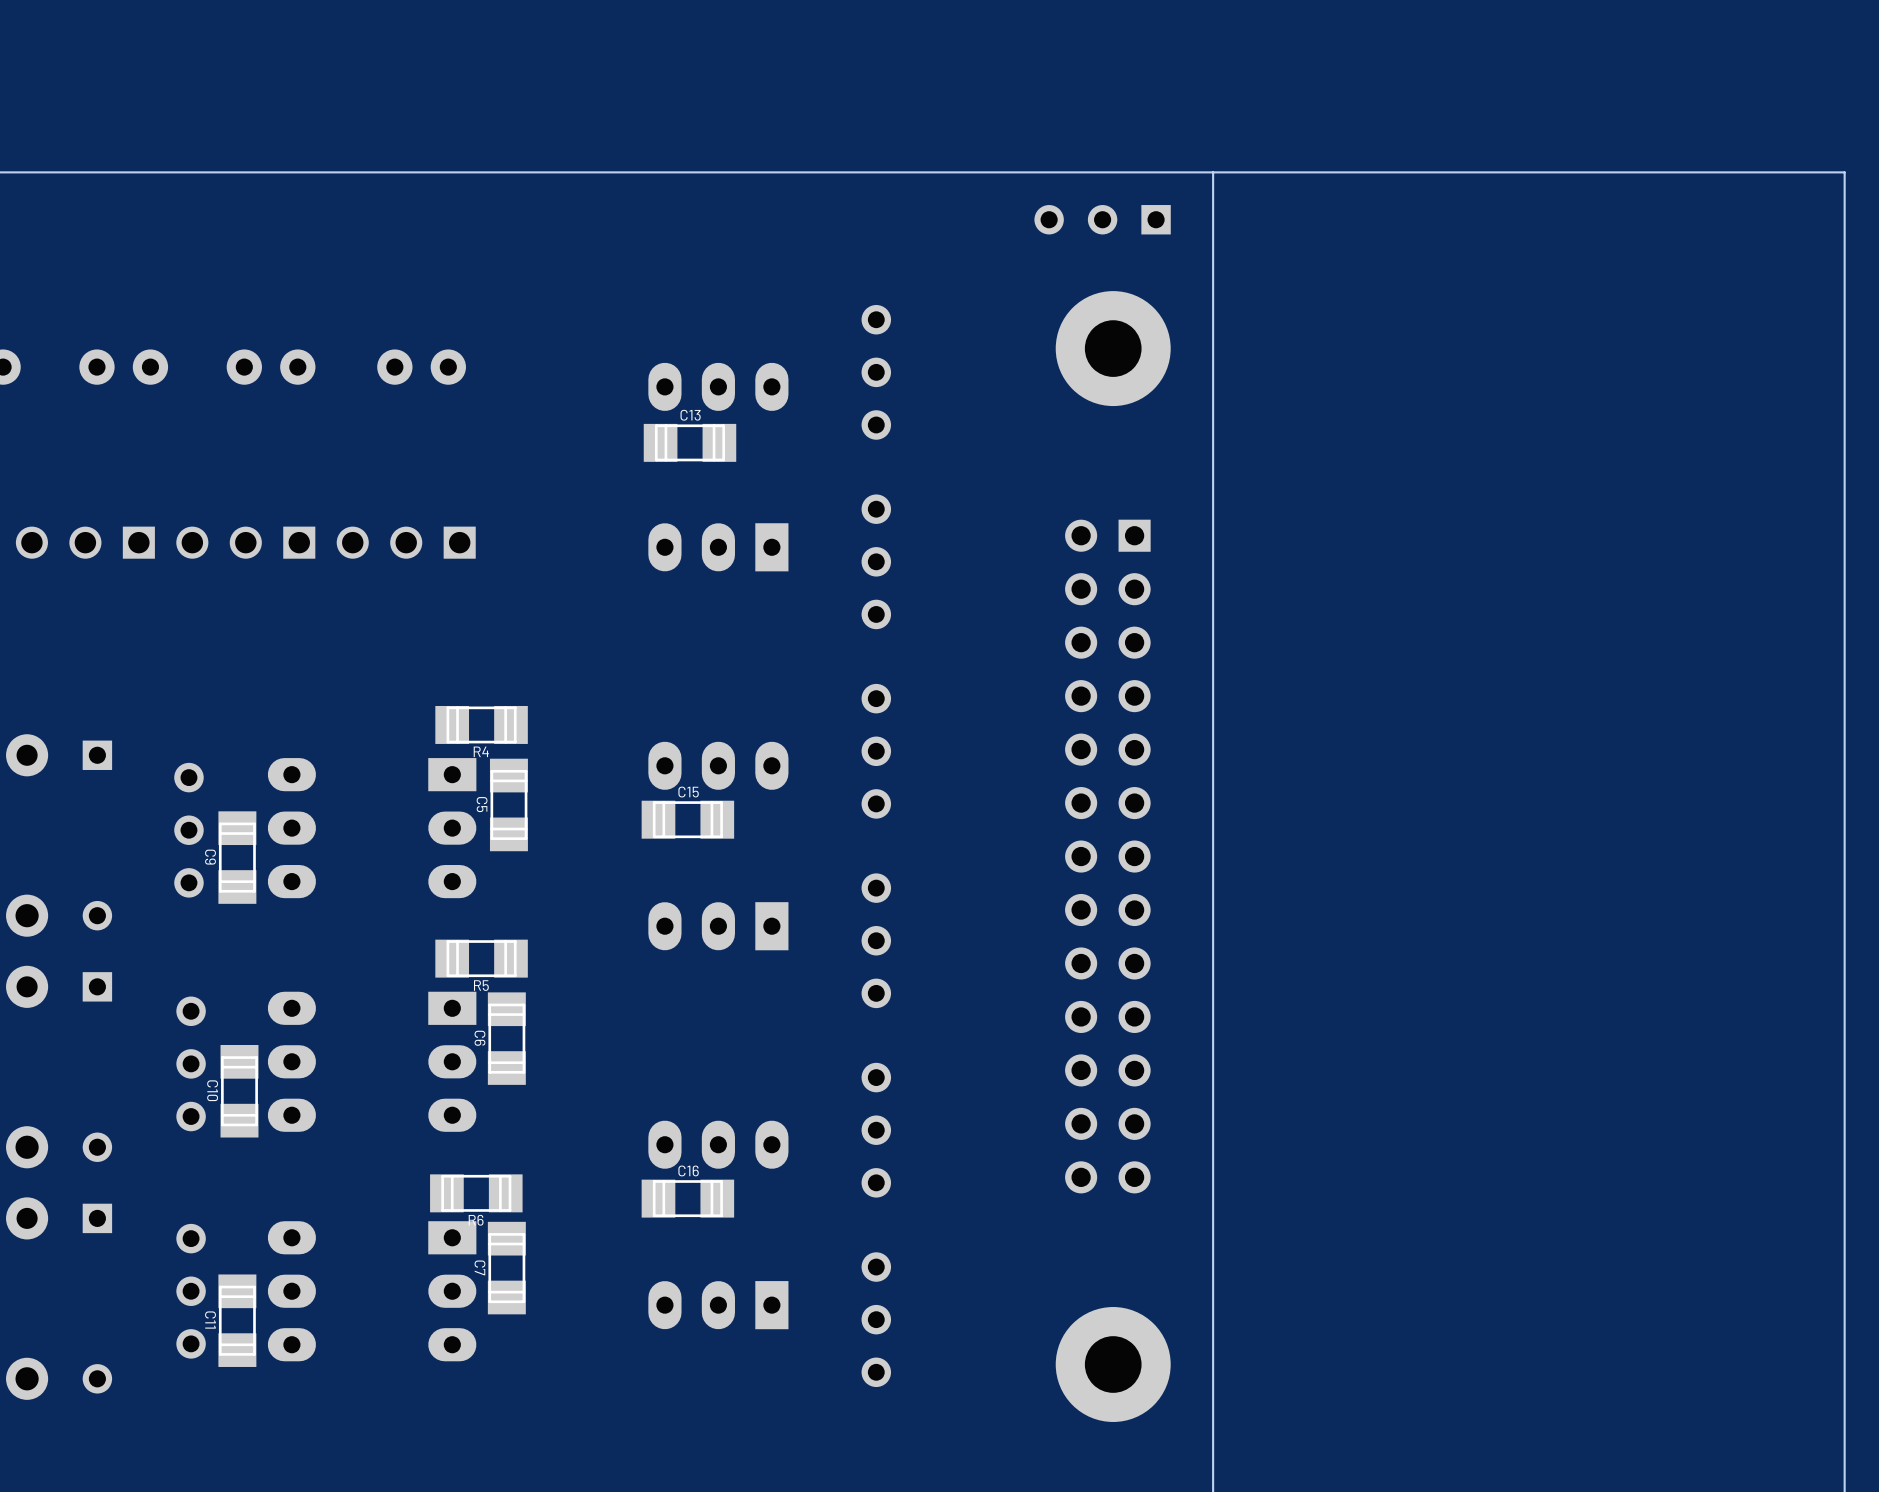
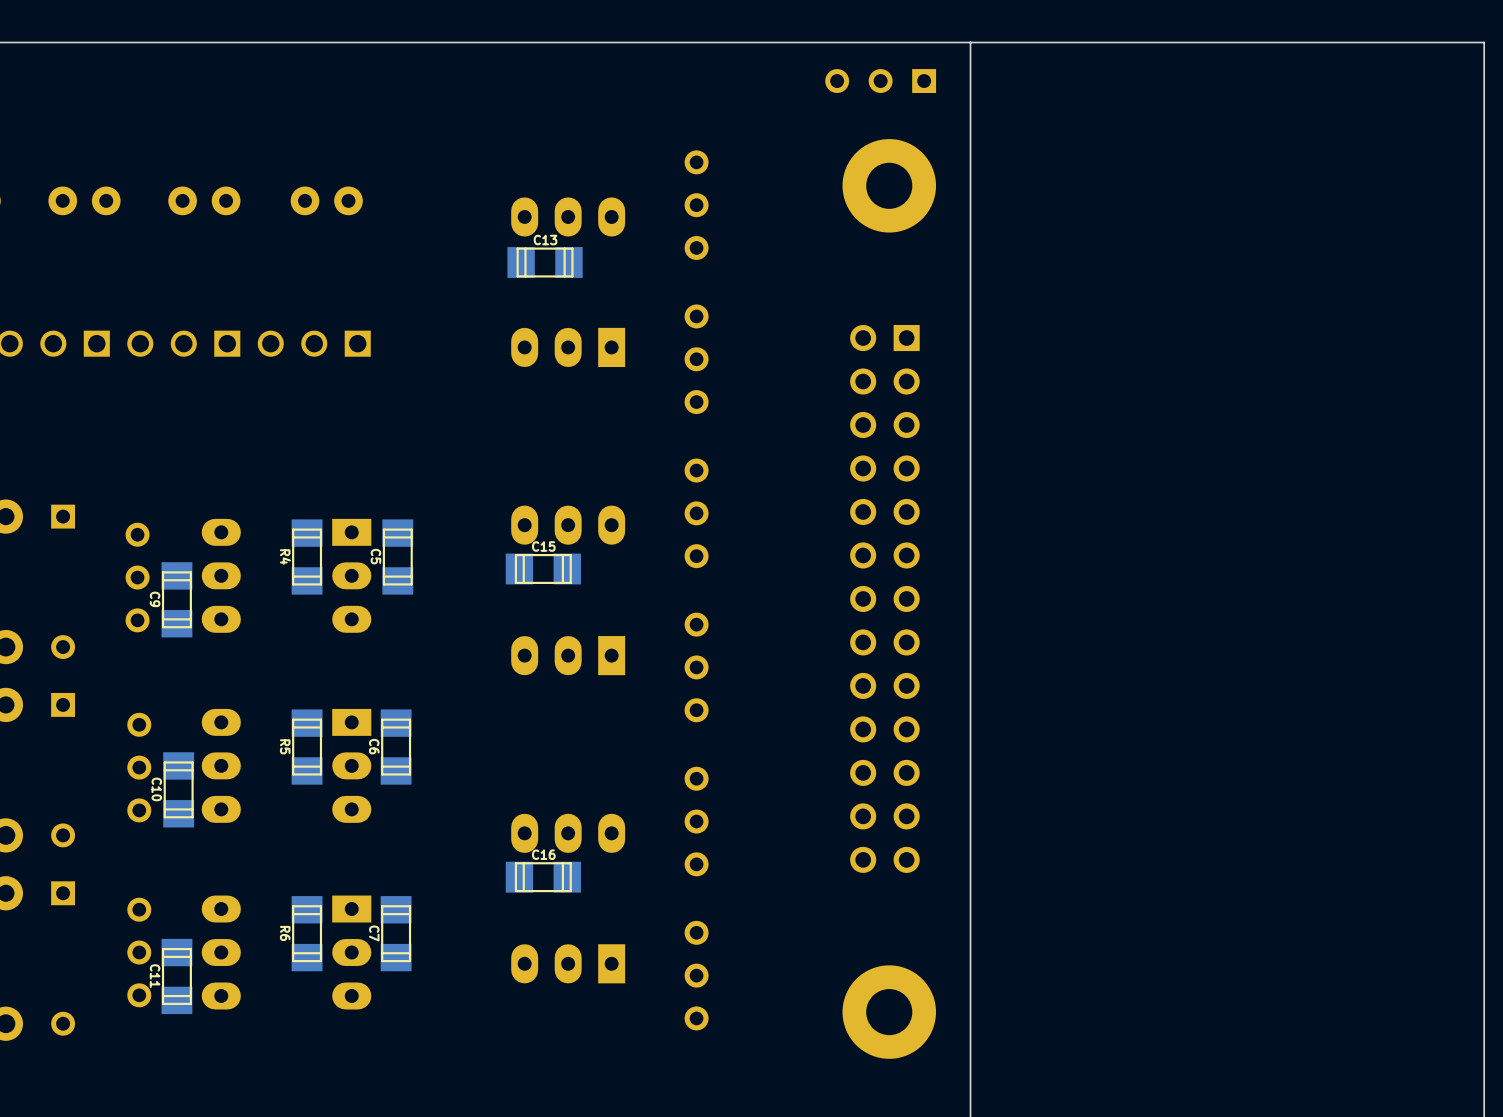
R4 rotation: 0° (481, 724) -> 90° clockwise (307, 557)
R4 position: (481, 724) -> (307, 557)
R5 rotation: 0° (481, 958) -> 90° clockwise (307, 747)
R5 position: (481, 958) -> (307, 747)
R6 rotation: 0° (476, 1193) -> 90° clockwise (307, 933)
R6 position: (476, 1193) -> (307, 933)

